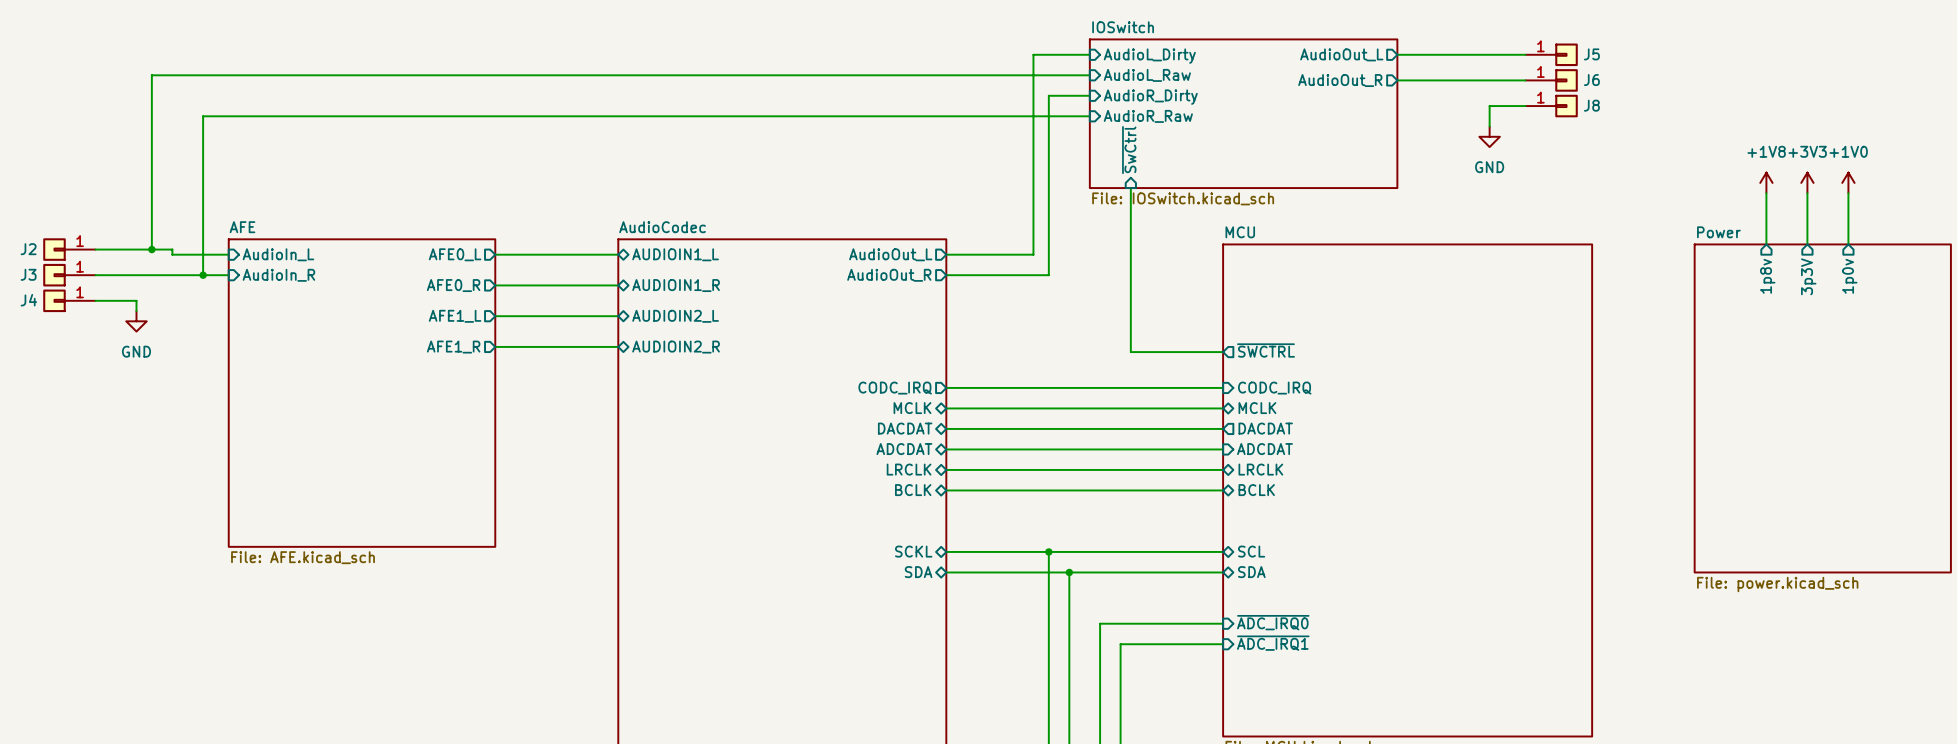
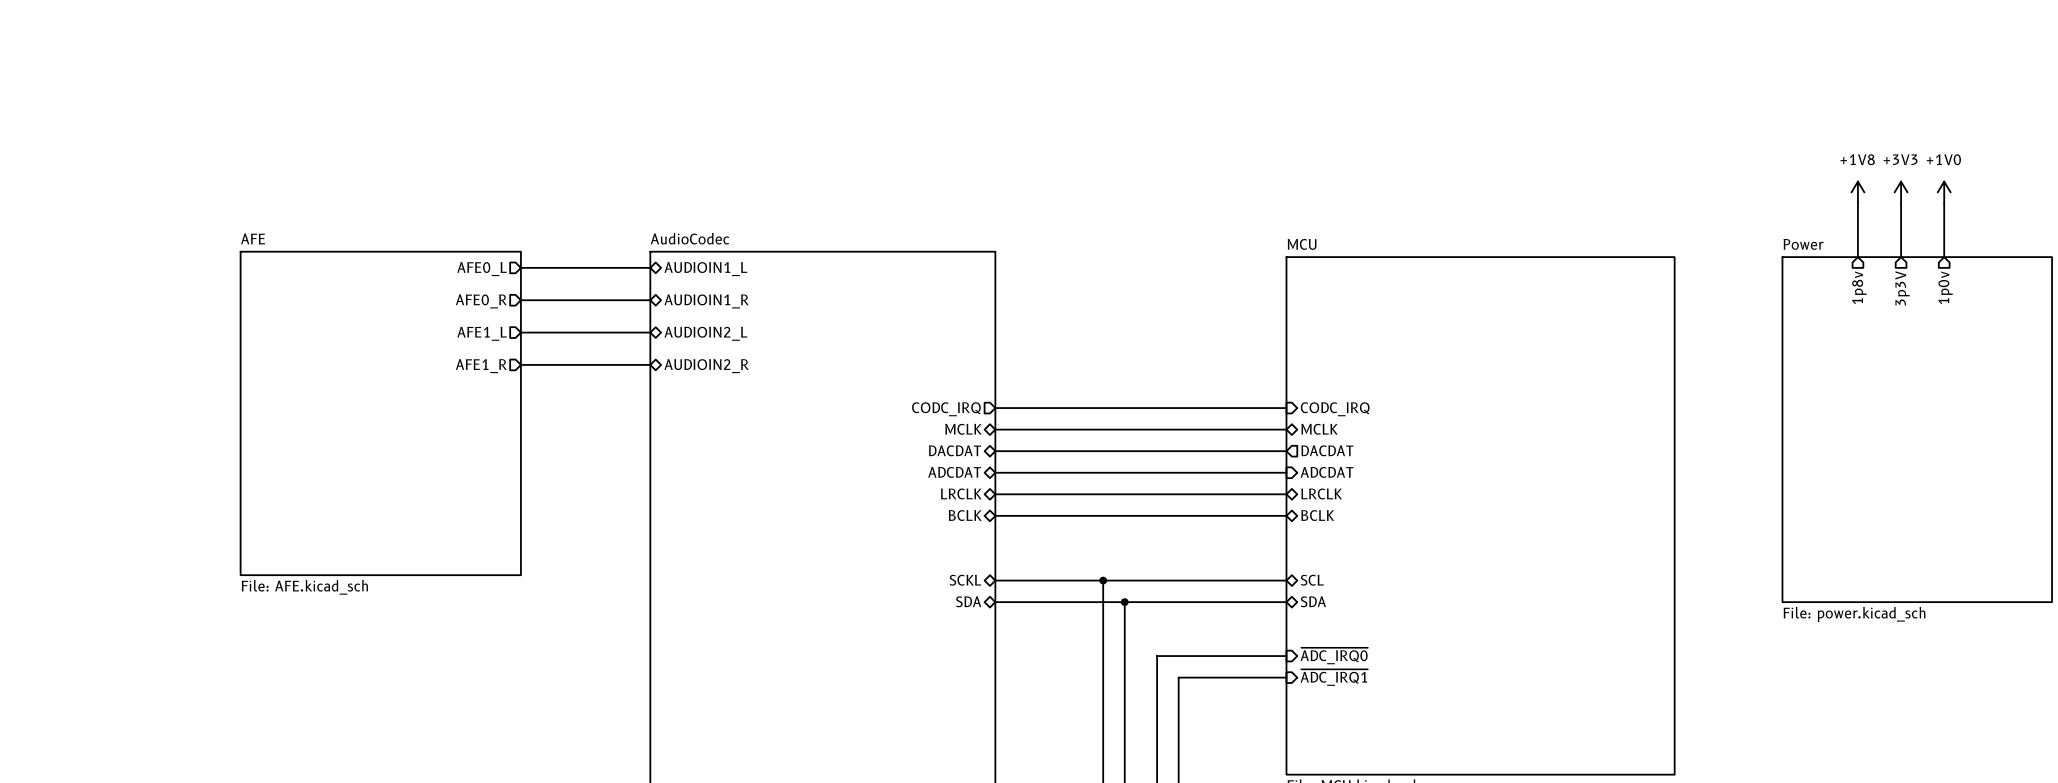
wire: (1089, 54) (1033, 54) (1033, 254) (946, 254) -> none
sheet pin: AudioOut_L (1341, 54) -> none
wire: (1397, 54) (1525, 54) -> none
J5: (1551, 54) -> none
sheet pin: AudioL_Dirty (1149, 56) -> none
wire: (1089, 75) (151, 75) (151, 249) -> none
sheet pin: AudioL_Raw (1147, 75) -> none
sheet pin: AudioOut_R (1340, 80) -> none
wire: (1397, 80) (1525, 80) -> none
J6: (1551, 80) -> none
wire: (1089, 95) (1048, 95) (1048, 275) (946, 275) -> none
sheet pin: AudioR_Dirty (1150, 97) -> none
wire: (1525, 106) (1489, 106) (1489, 126) -> none
J8: (1551, 106) -> none
sheet IOSwitch: File: IOSwitch.kicad_sch (1243, 113) -> none
wire: (1089, 116) (203, 116) (203, 275) -> none
sheet pin: AudioR_Raw (1148, 116) -> none
power symbol: GND (1489, 136) -> none
sheet pin: ~{SwCtrl} (1129, 150) -> none
wire: (1130, 188) (1130, 352) (1223, 352) -> none
J2: (69, 249) -> none
wire: (95, 249) (172, 249) (172, 254) (228, 254) -> none
junction: (151, 249) -> none
sheet pin: AudioIn_L (278, 254) -> none
sheet pin: AudioOut_L (890, 254) -> none
J3: (69, 275) -> none
wire: (95, 275) (228, 275) -> none
junction: (203, 275) -> none
sheet pin: AudioIn_R (278, 275) -> none
sheet pin: AudioOut_R (889, 275) -> none
J4: (69, 300) -> none
wire: (95, 300) (136, 300) (136, 311) -> none
power symbol: GND (136, 321) -> none
sheet pin: ~{SWCTRL} (1266, 350) -> none

